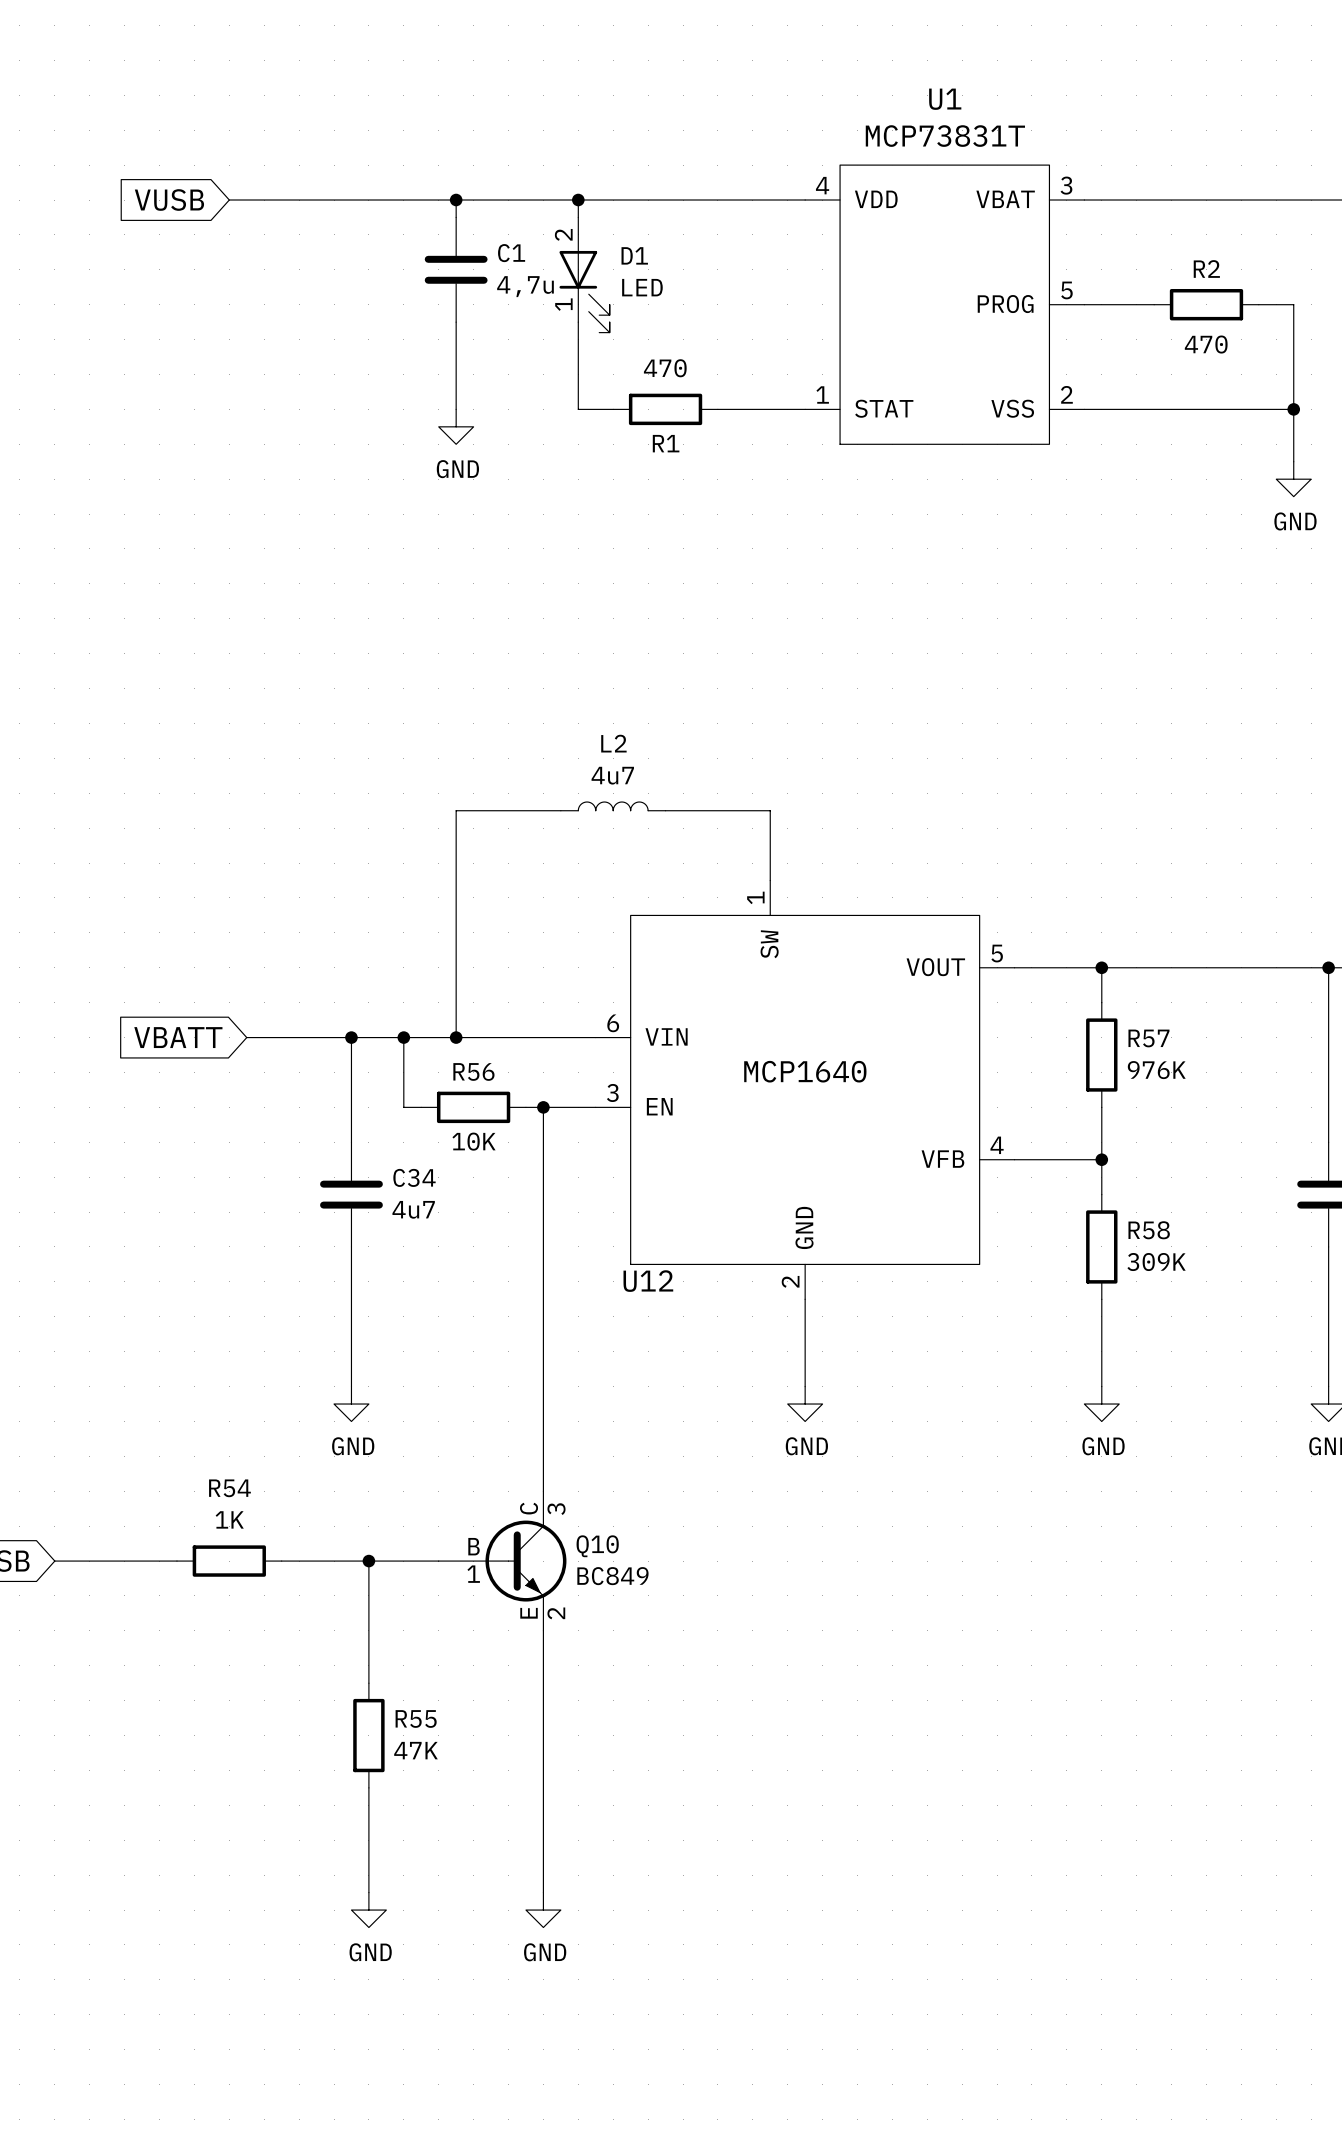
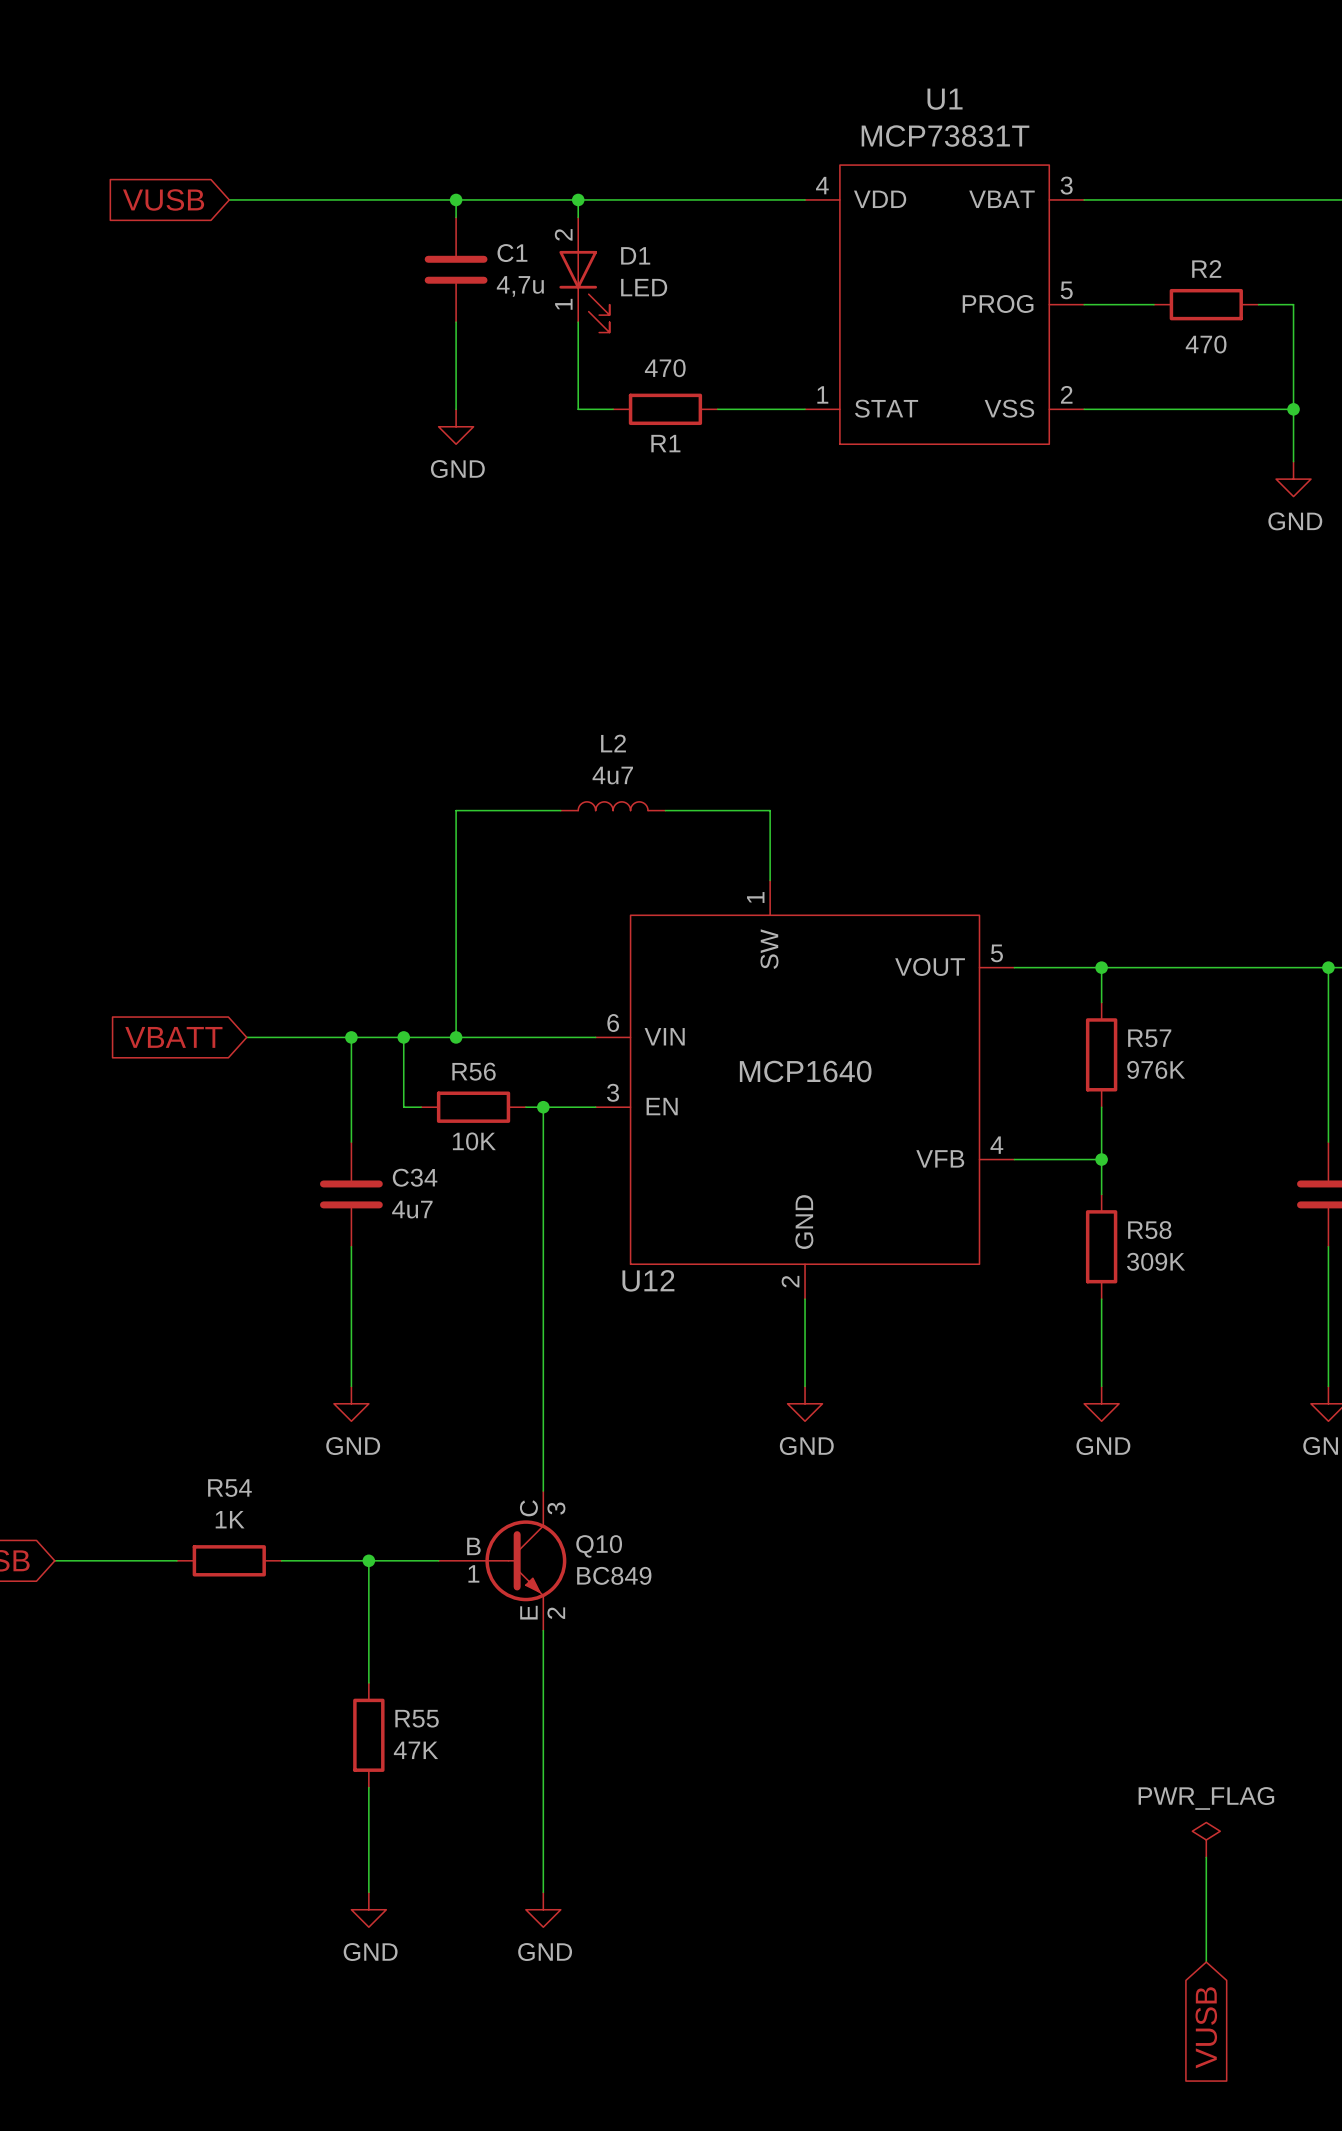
power symbol: none -> PWR_FLAG (1206, 1839)
wire: none -> (1206, 1857) (1206, 1962)
global label: none -> VUSB (1206, 2027)

